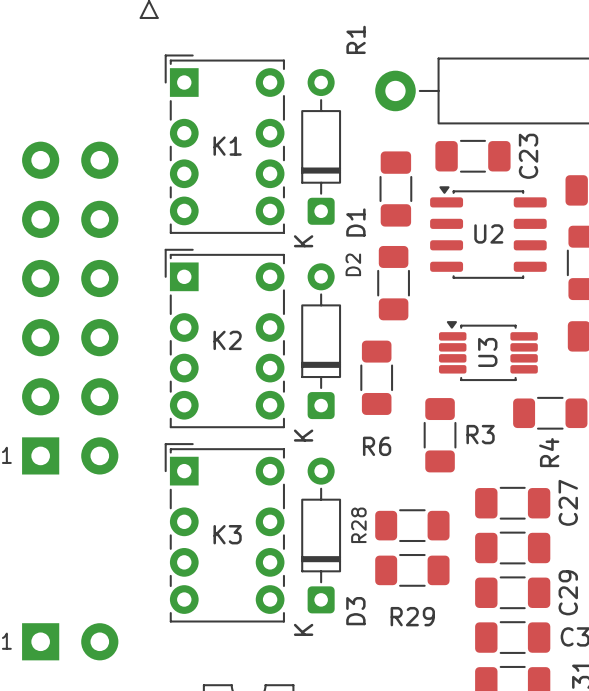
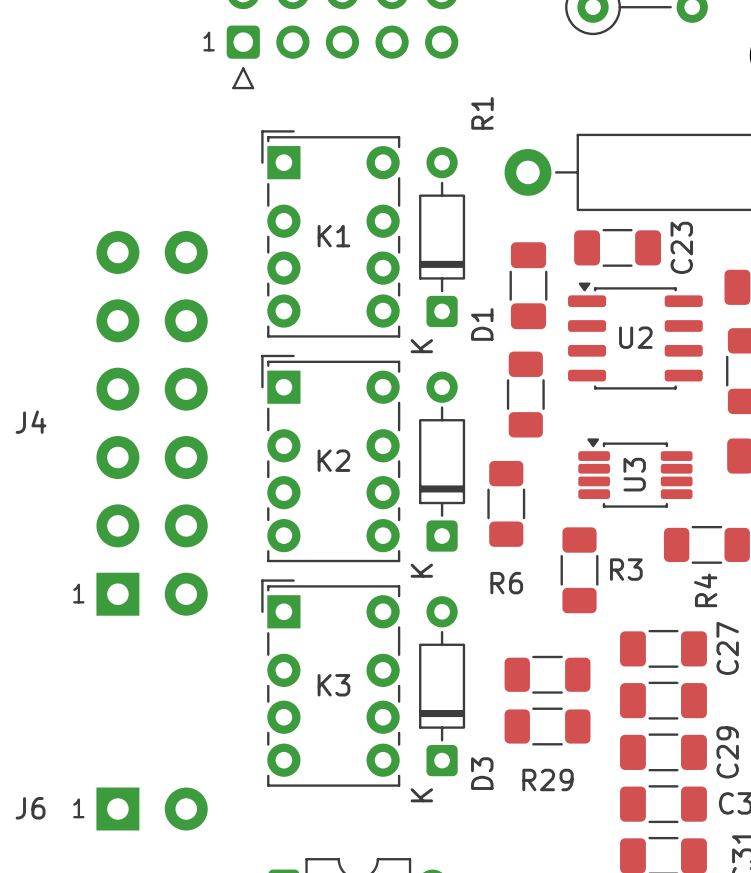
D2 name: D2 (353, 264) -> none
R28 name: R28 (358, 525) -> none

